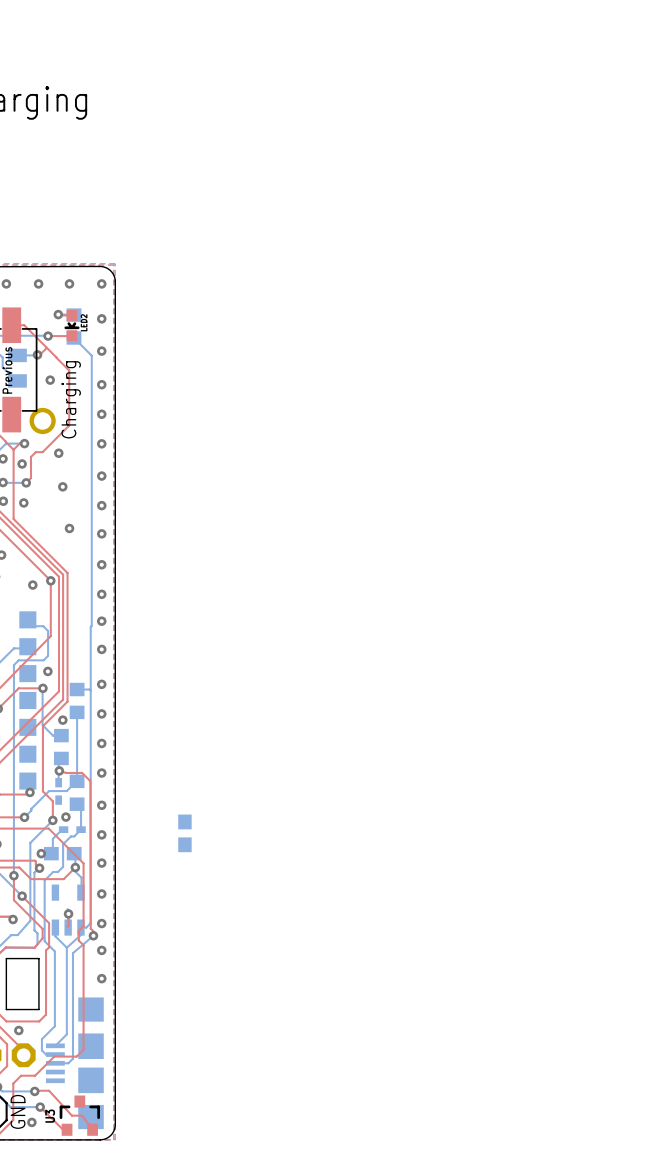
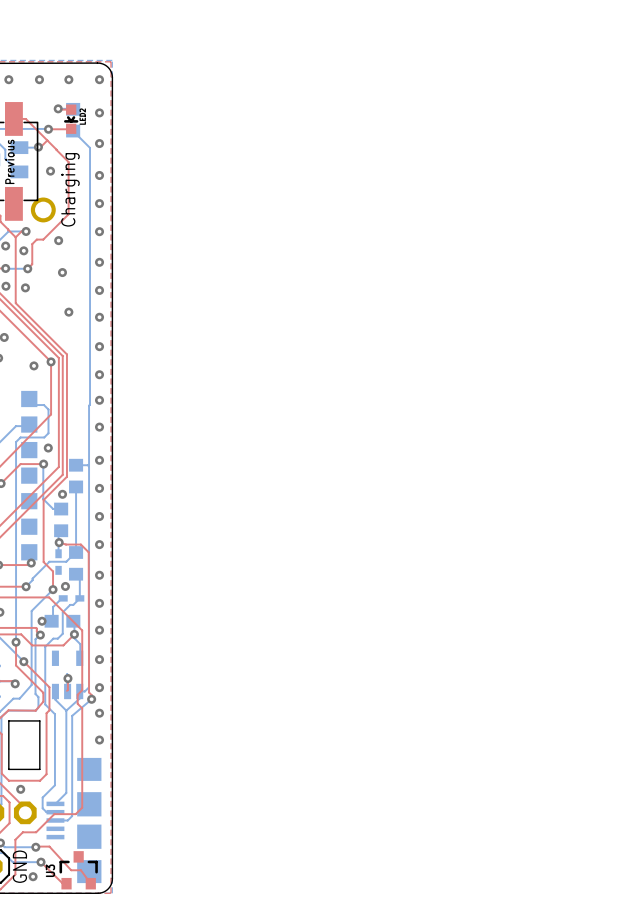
part: (184, 833) -> none

